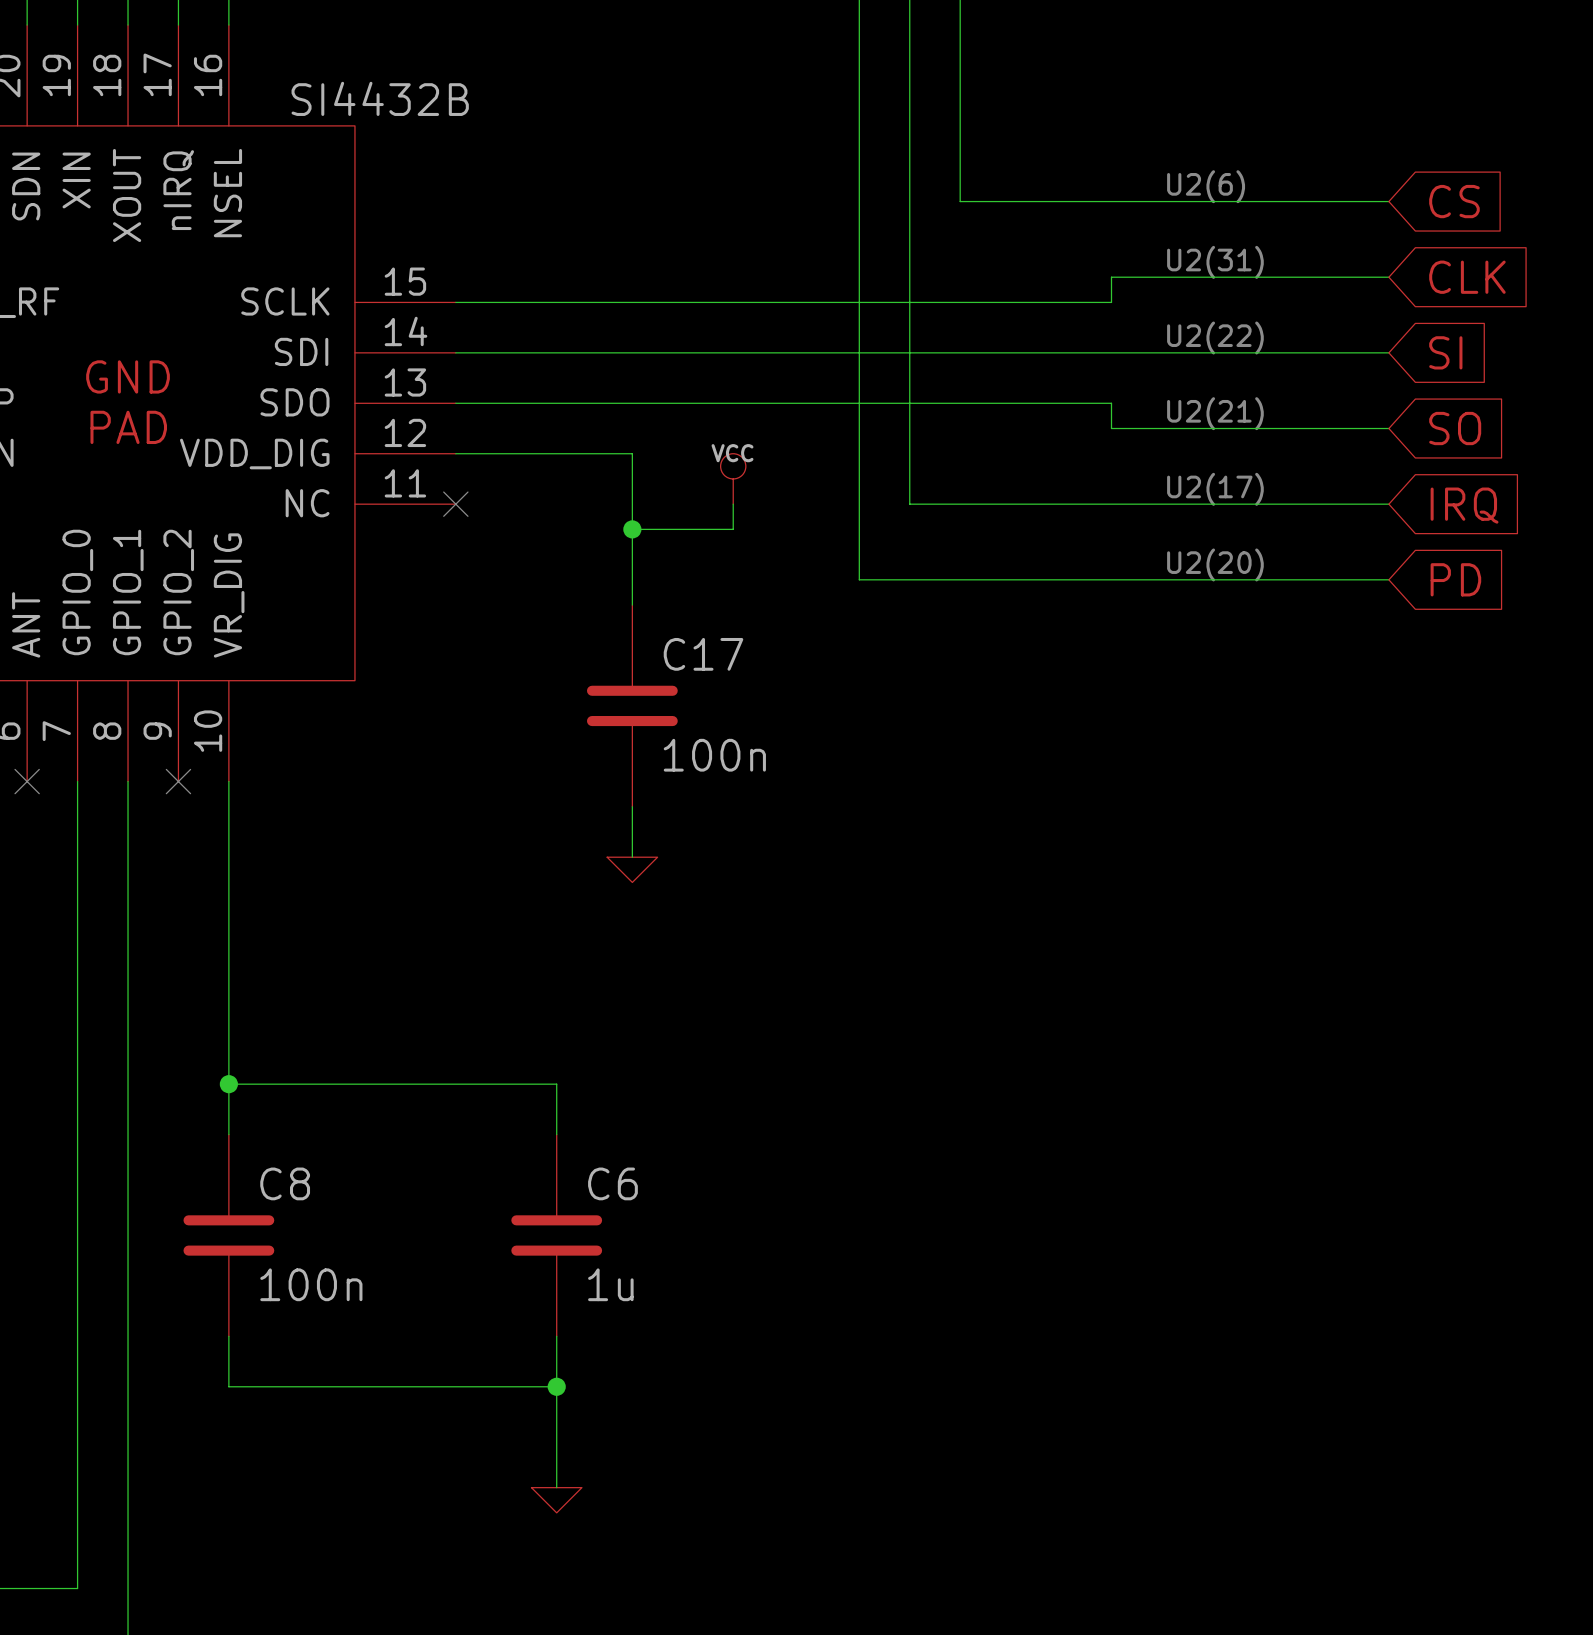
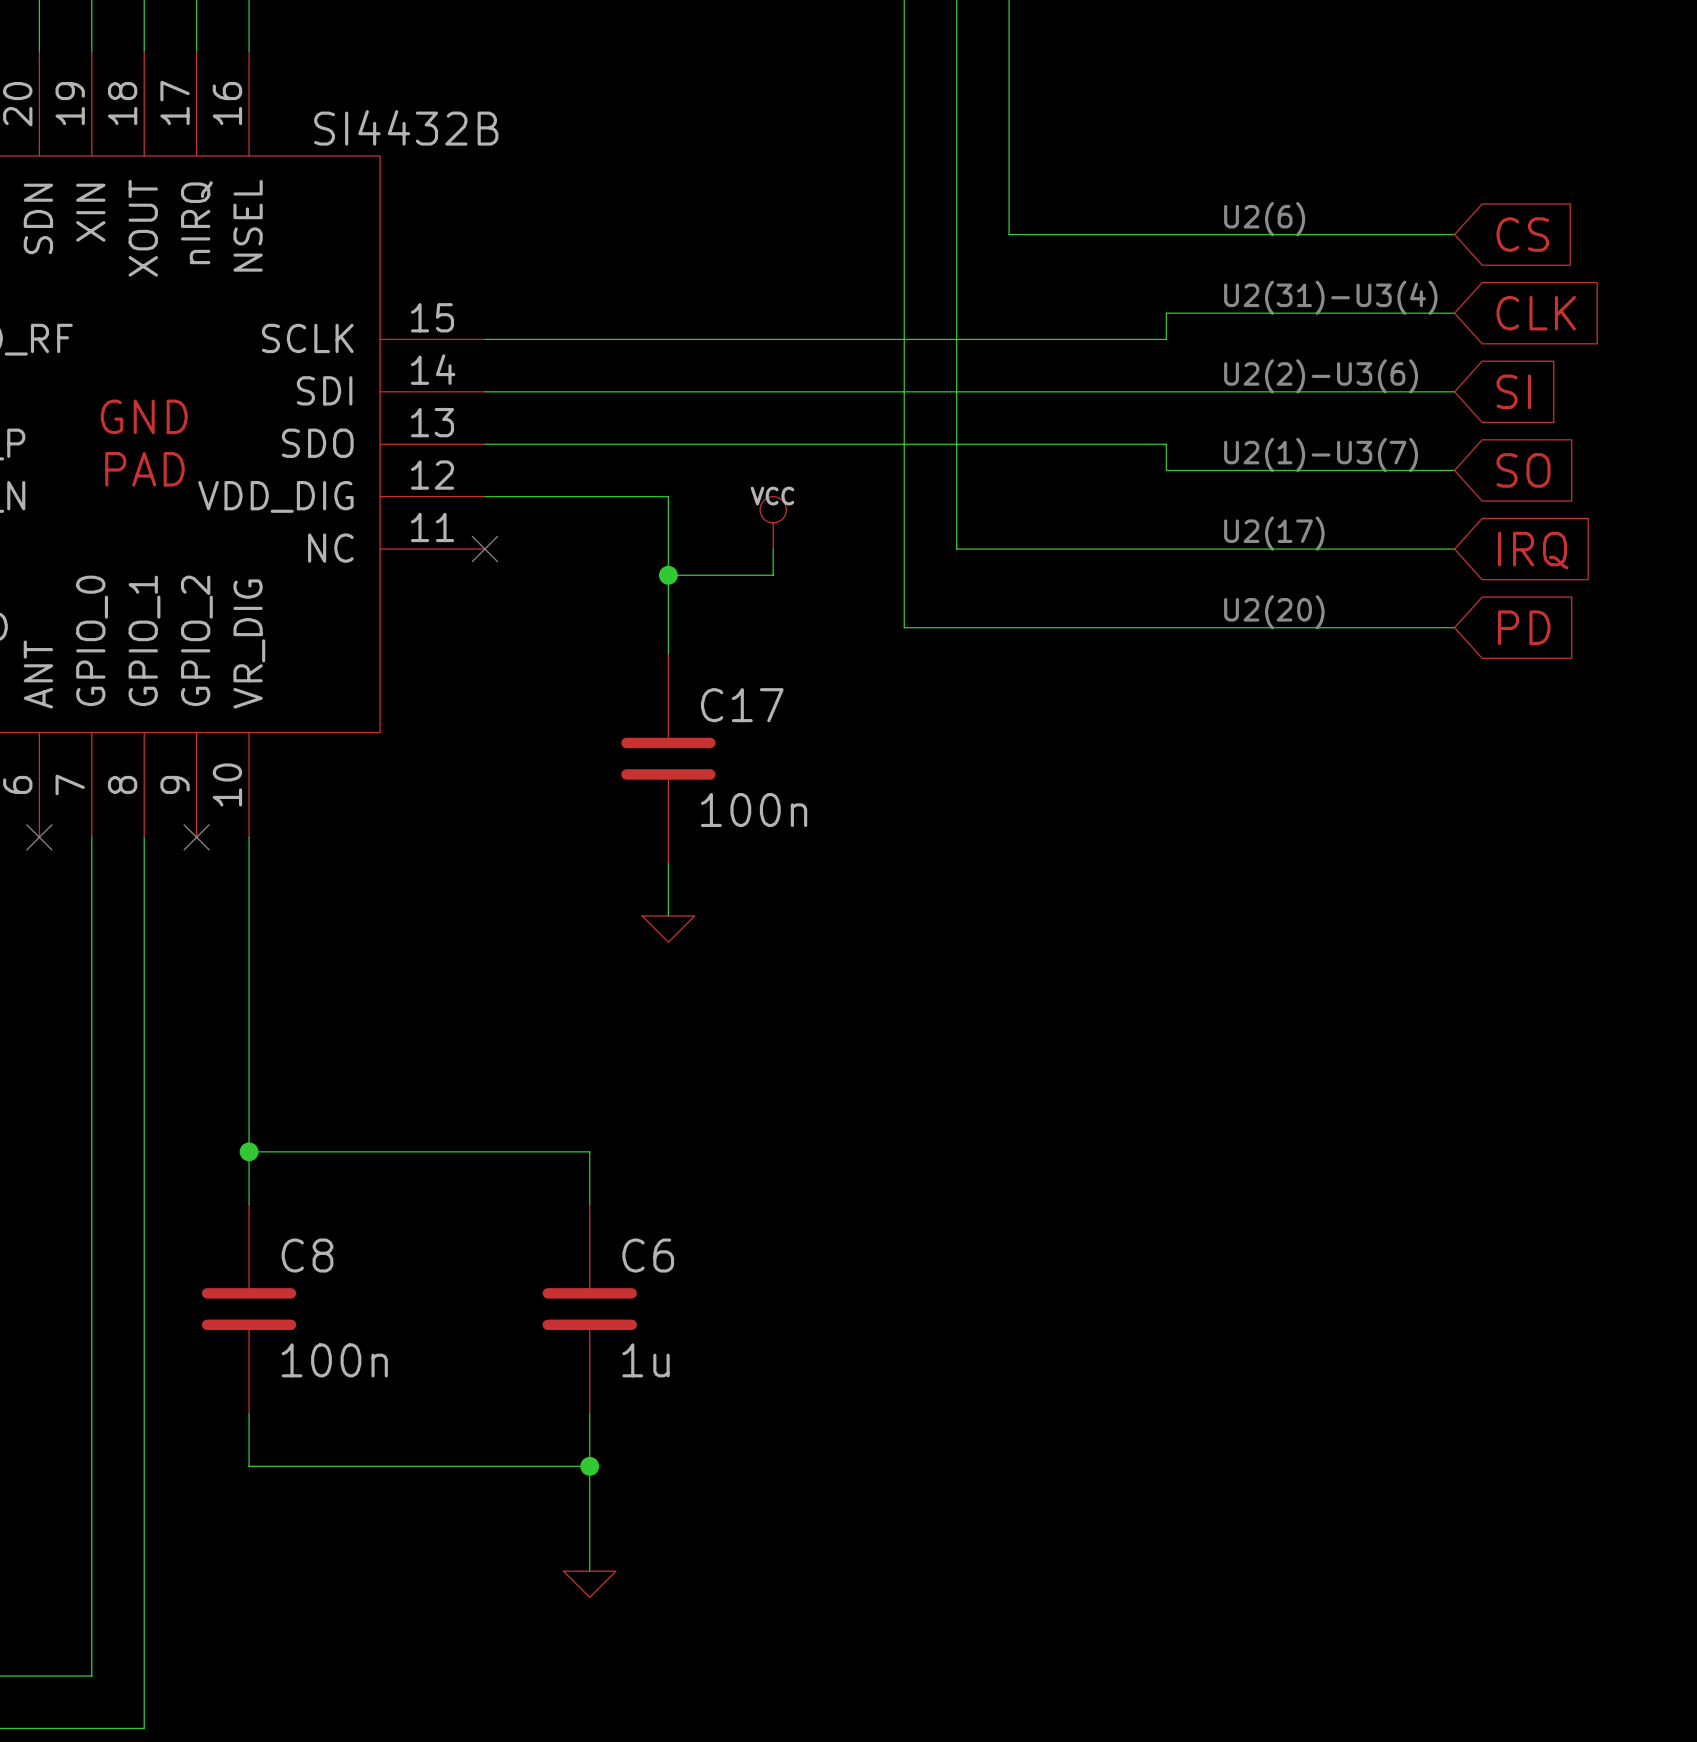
text: U2(31) (1215, 262) -> U2(31)-U3(4) (1330, 297)
text: U2(22) (1215, 338) -> U2(2)-U3(6) (1321, 376)
text: U2(21) (1215, 413) -> U2(1)-U3(7) (1321, 455)

